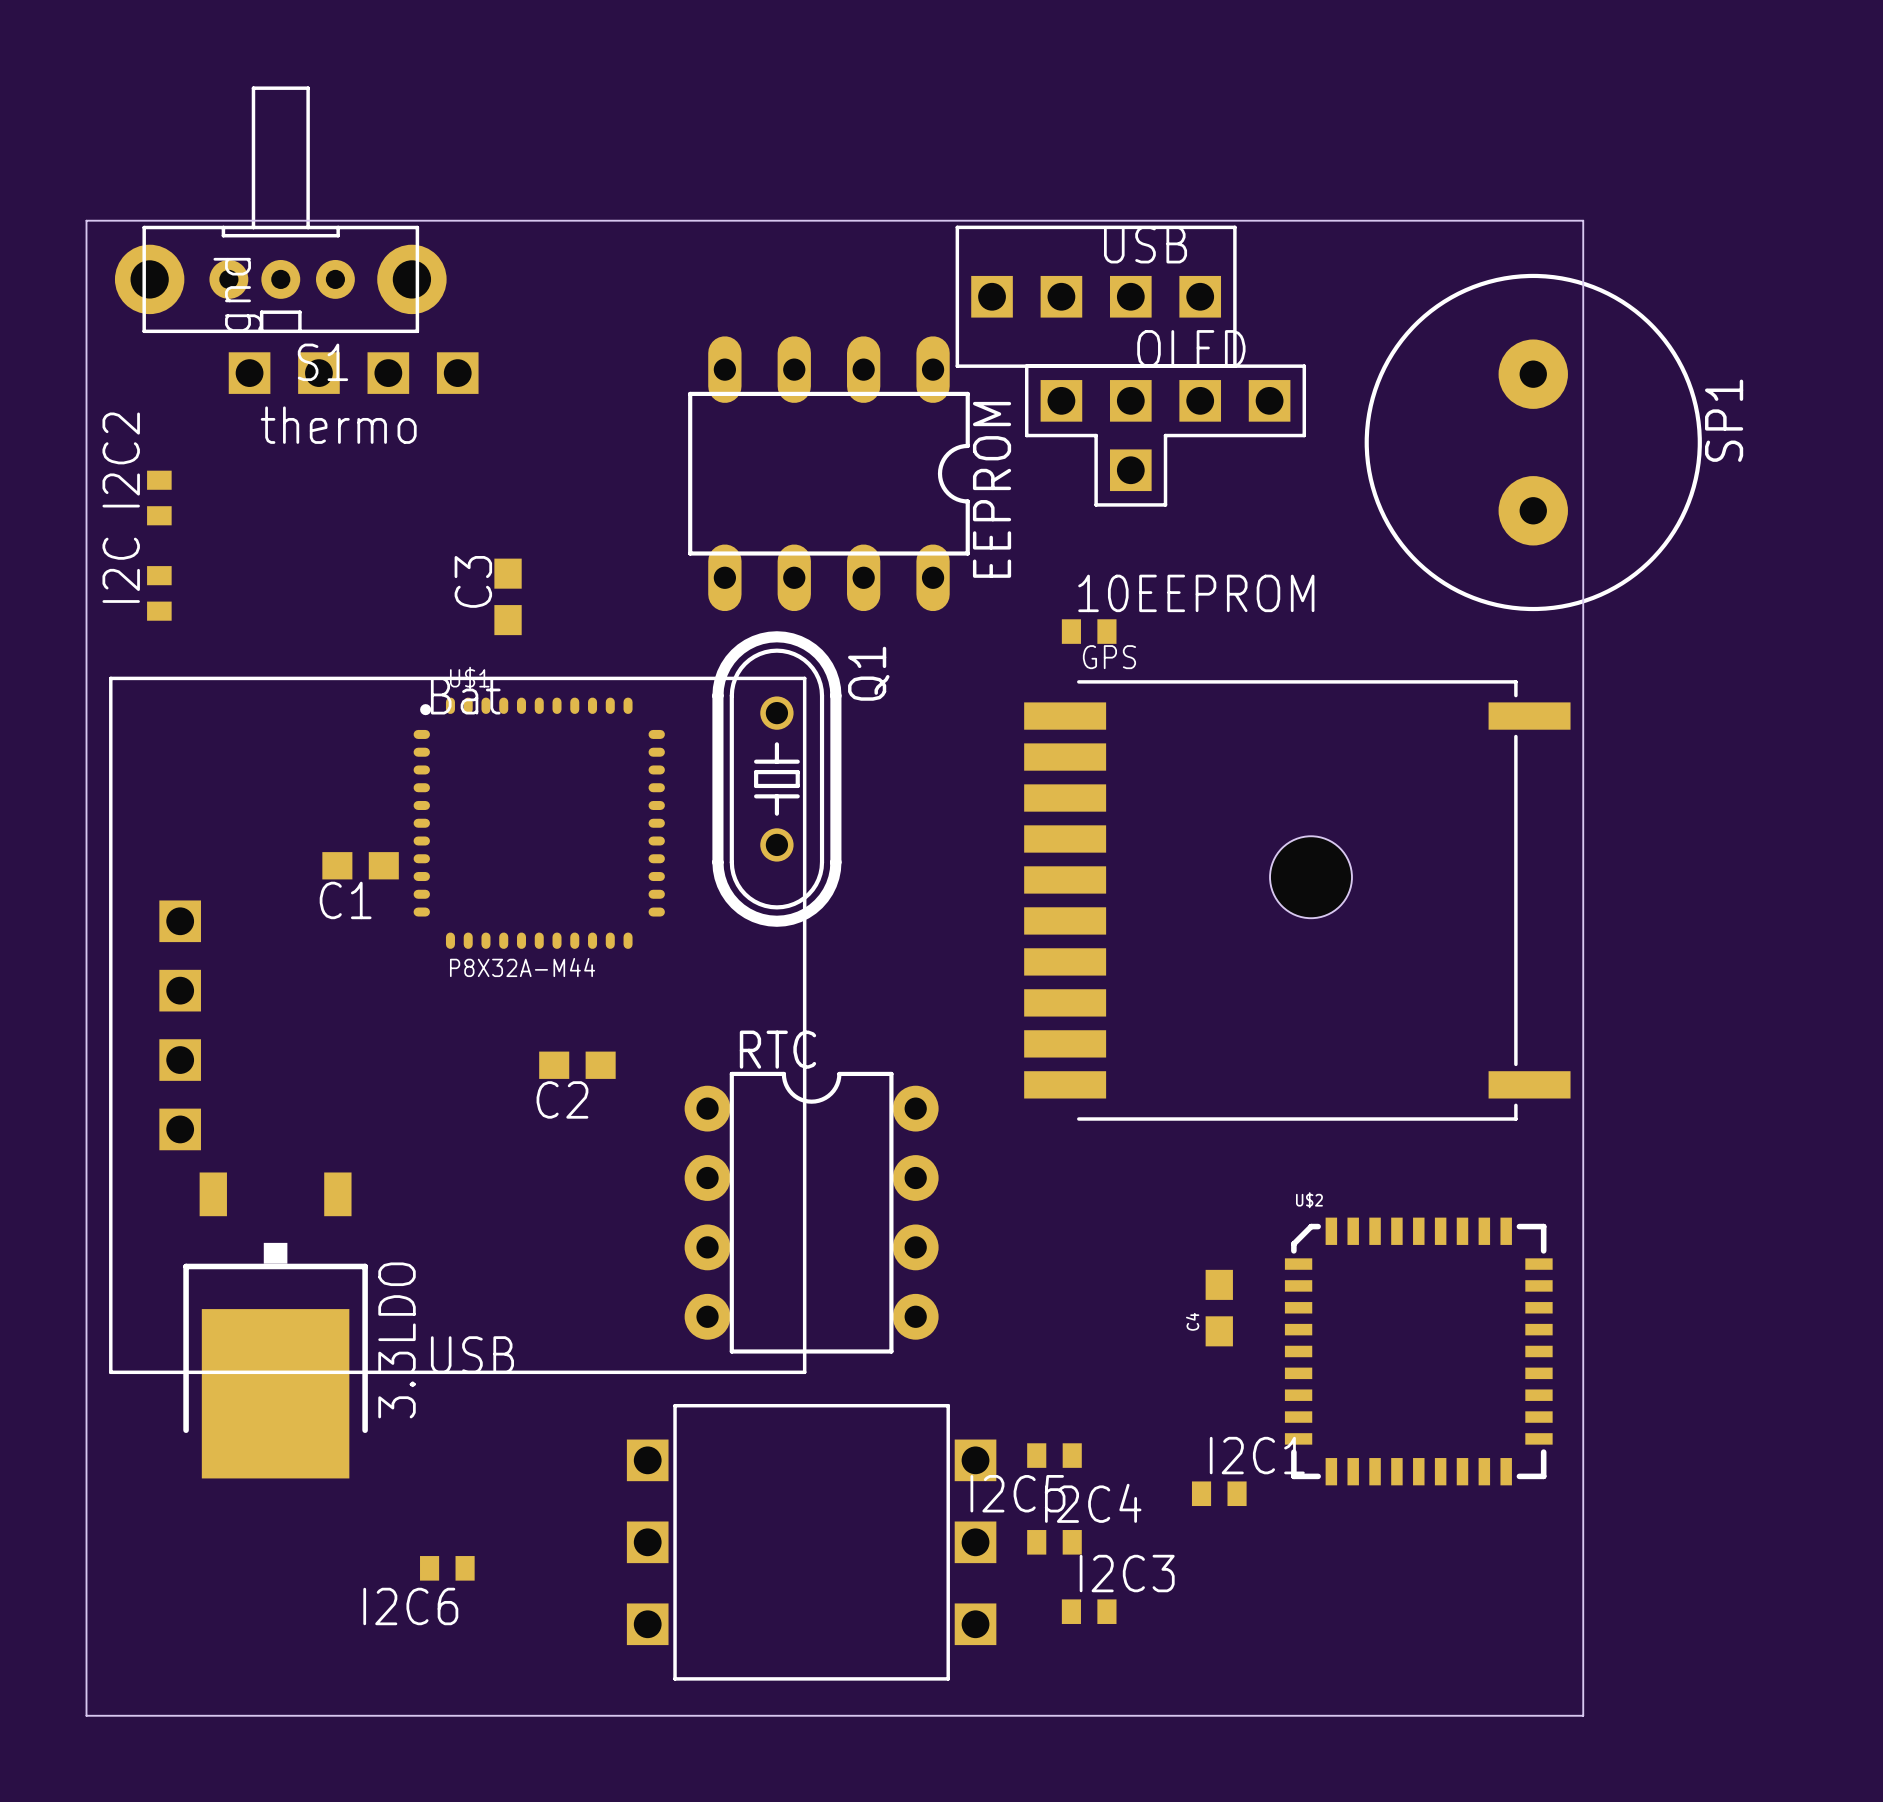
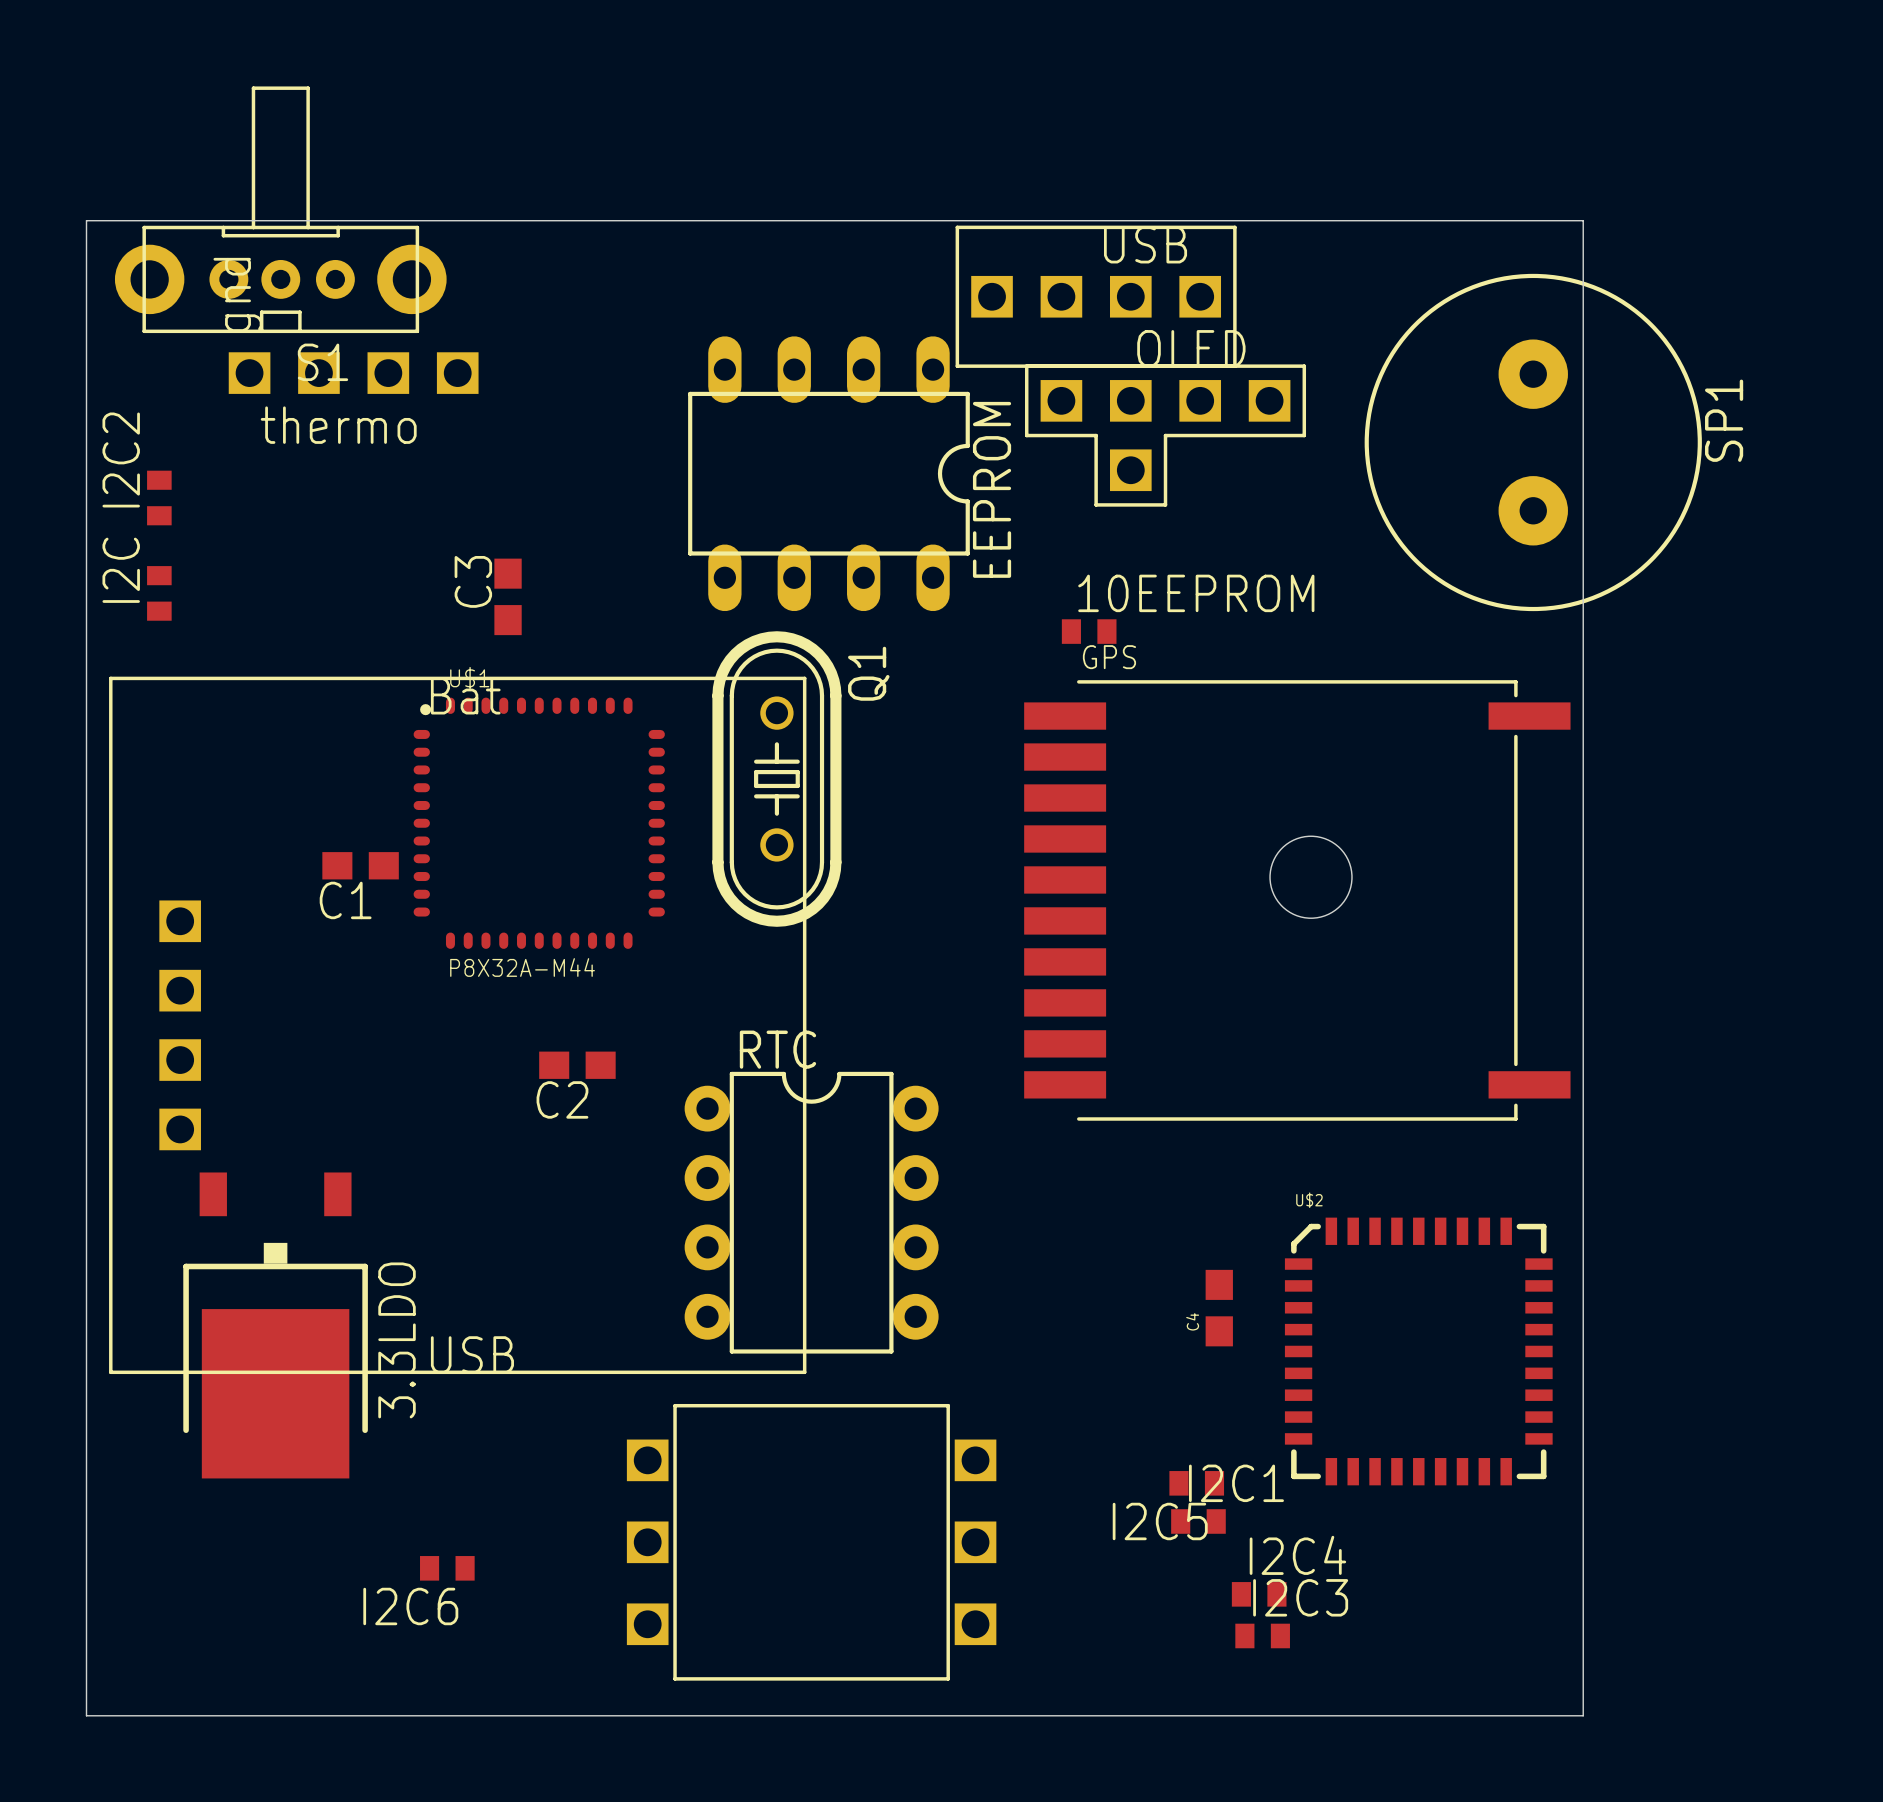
I2C5 position: (1054, 1455) -> (1196, 1483)
I2C1 position: (1219, 1493) -> (1198, 1521)
I2C4 position: (1054, 1542) -> (1259, 1594)
I2C3 position: (1089, 1611) -> (1262, 1635)

